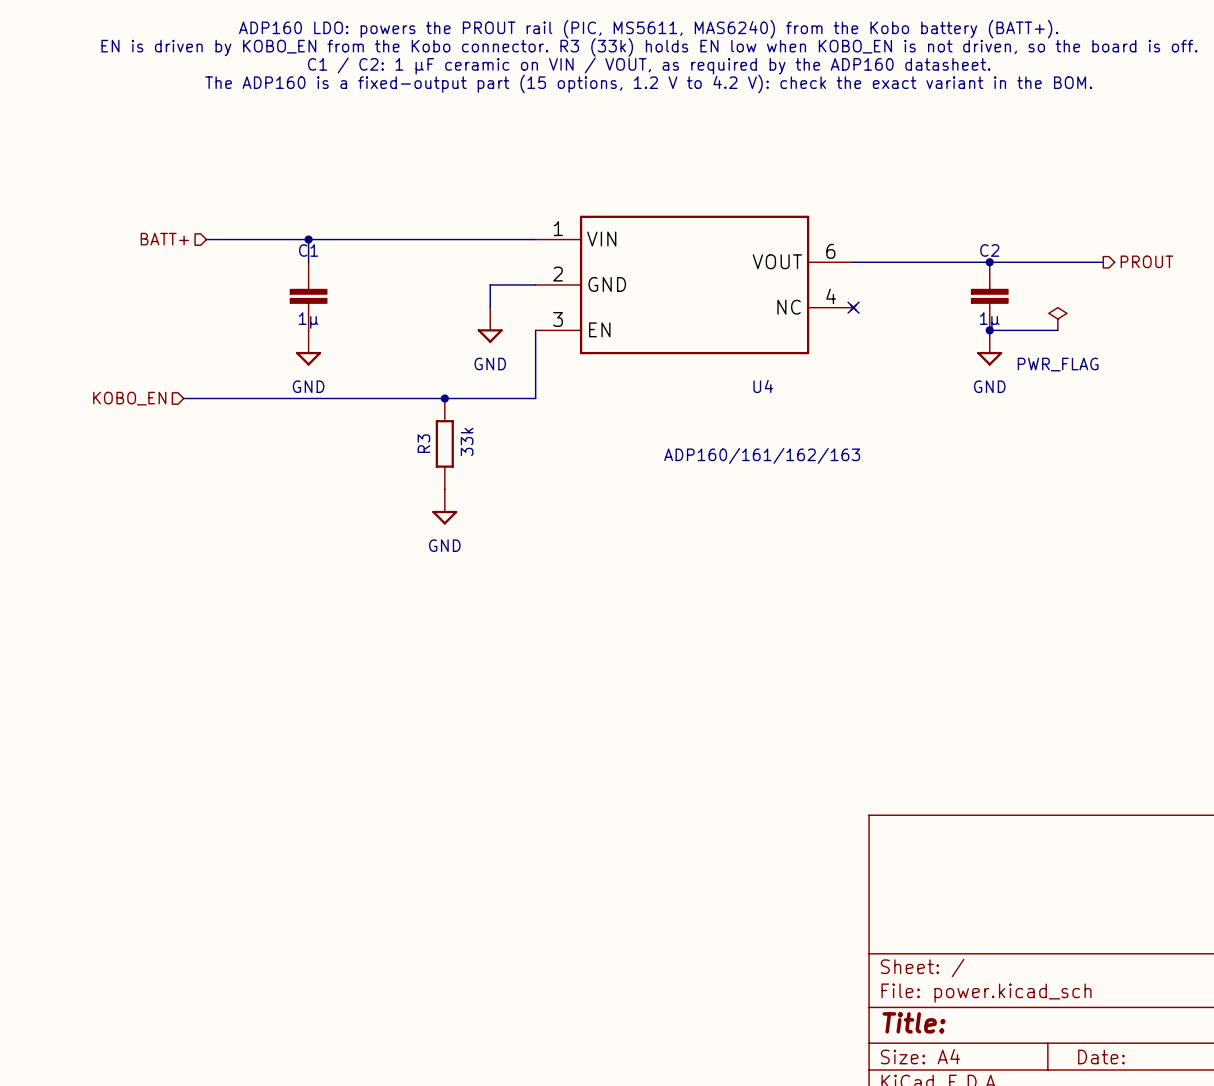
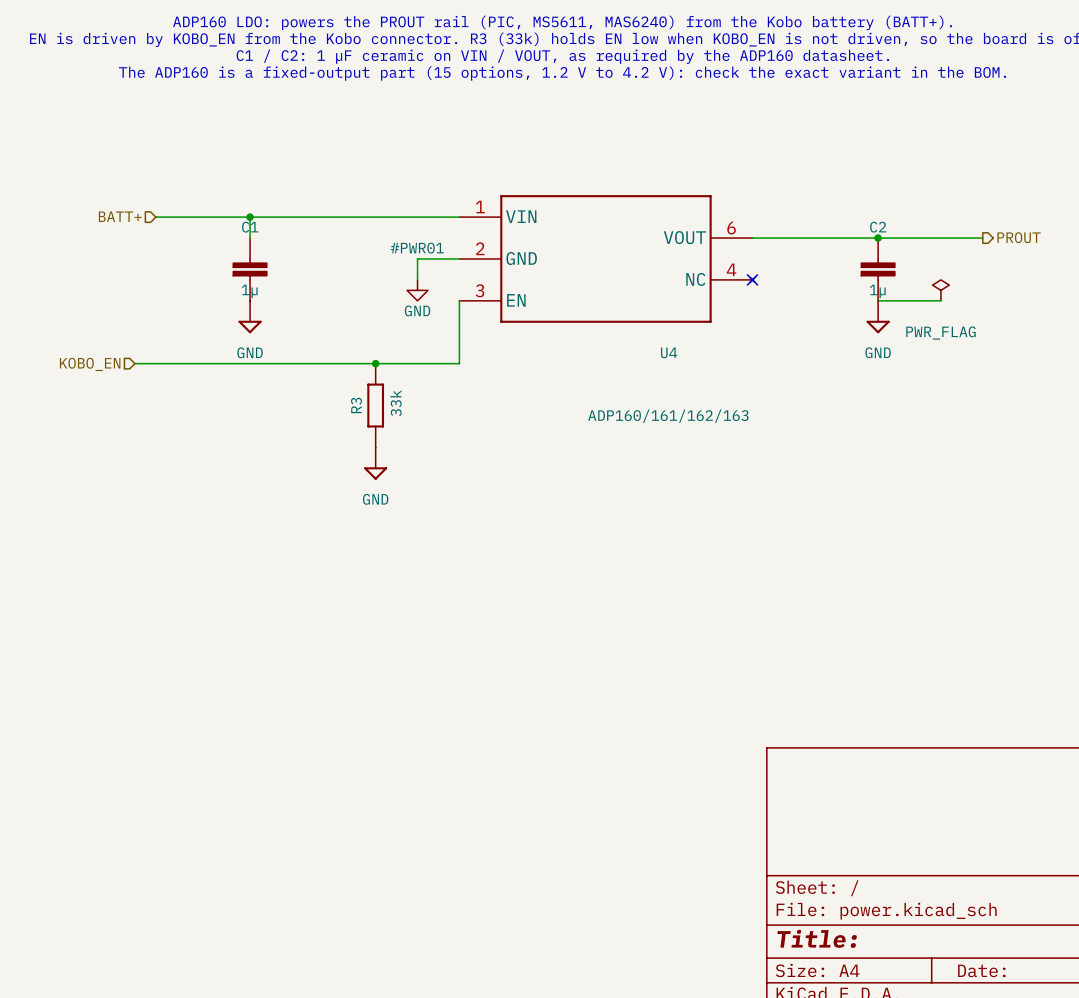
#PWR01 name: none -> #PWR01 (417, 248)
#PWR01 shape: [477, 307, 503, 343] -> [407, 279, 429, 301]
junction: (989, 330) -> none

